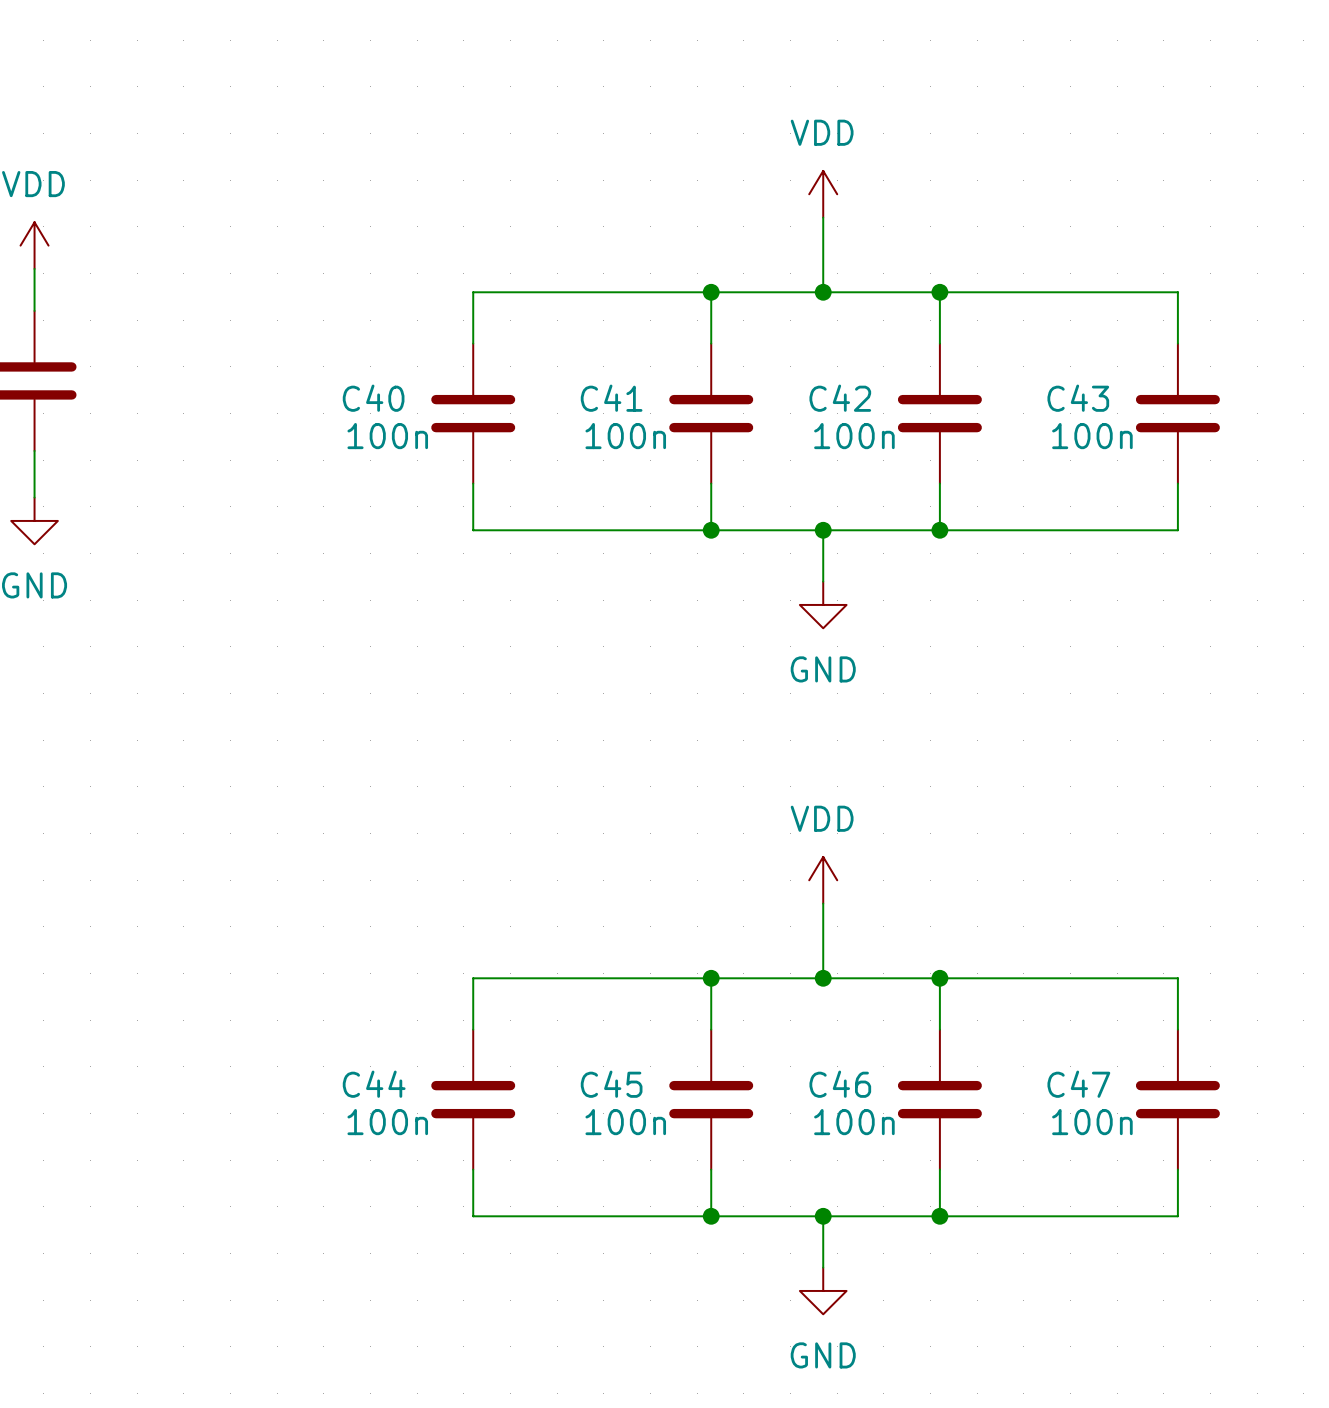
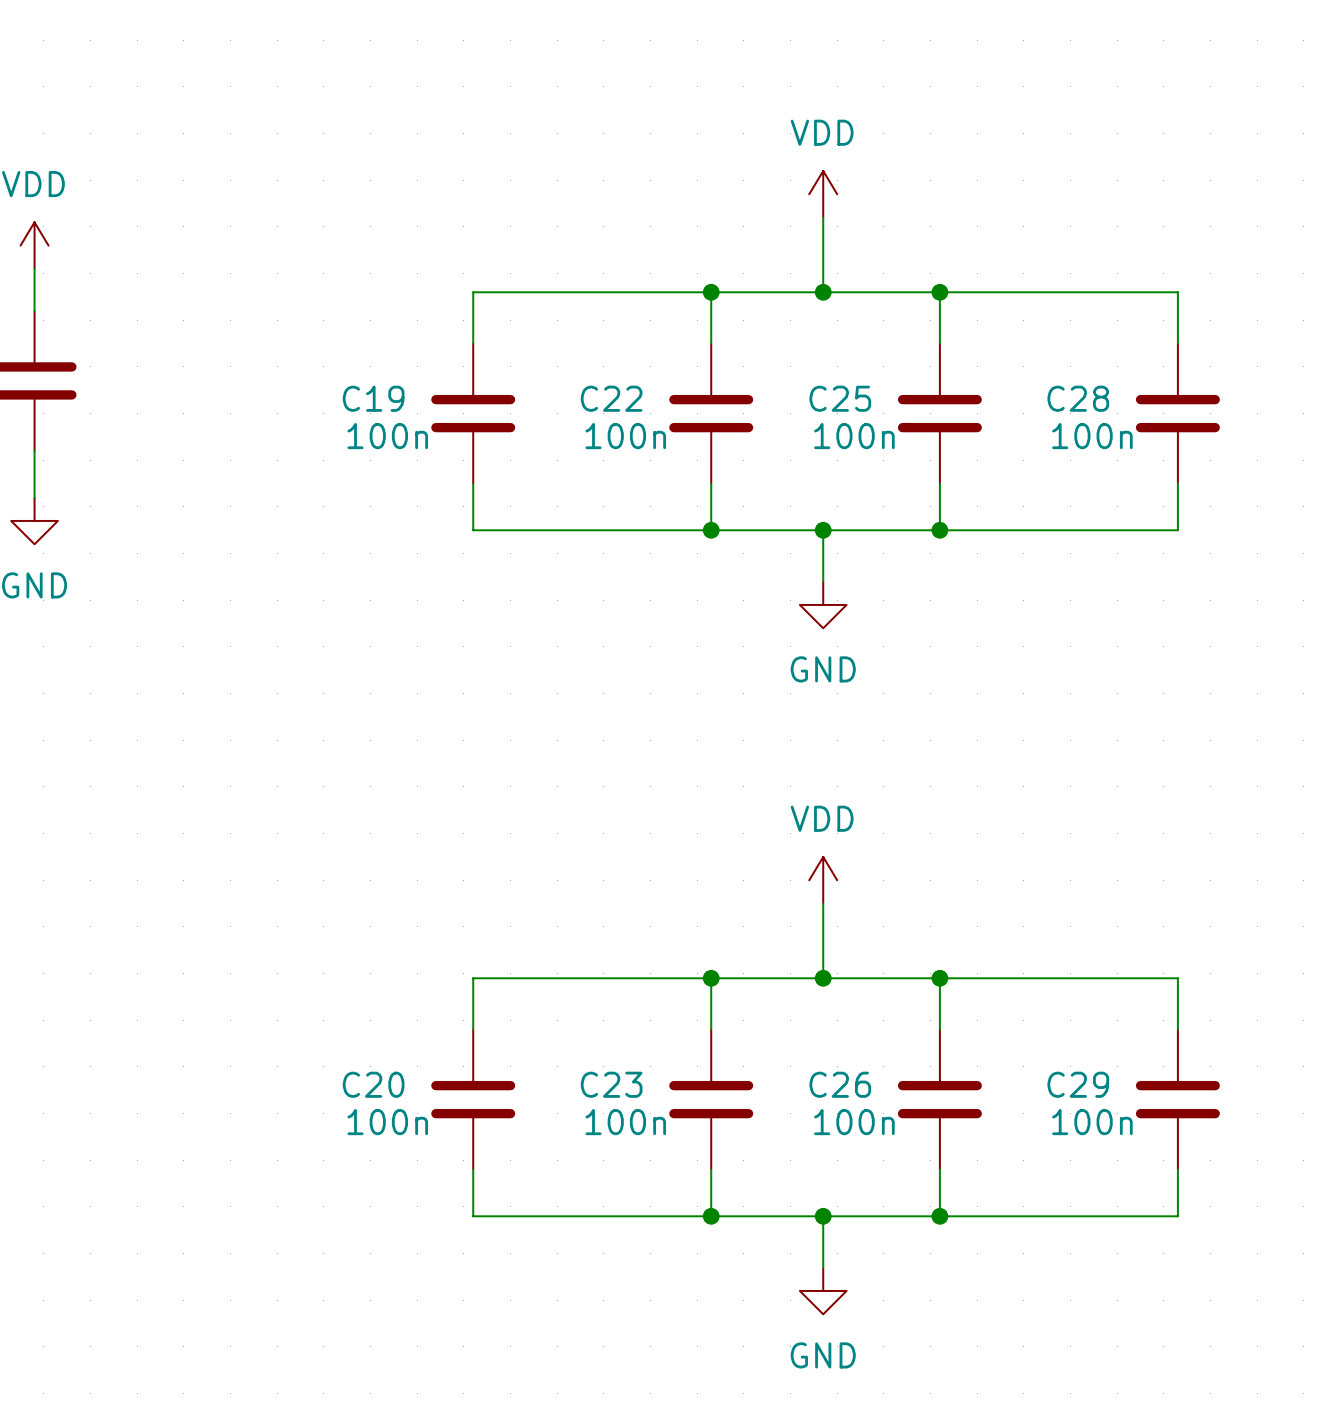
C40 name: C40 (373, 398) -> C19 (373, 398)
C41 name: C41 (611, 398) -> C22 (611, 398)
C42 name: C42 (840, 398) -> C25 (840, 398)
C43 name: C43 (1078, 398) -> C28 (1078, 398)
C44 name: C44 (374, 1084) -> C20 (373, 1084)
C45 name: C45 (611, 1084) -> C23 (611, 1084)
C46 name: C46 (840, 1084) -> C26 (840, 1084)
C47 name: C47 (1078, 1084) -> C29 (1078, 1084)

